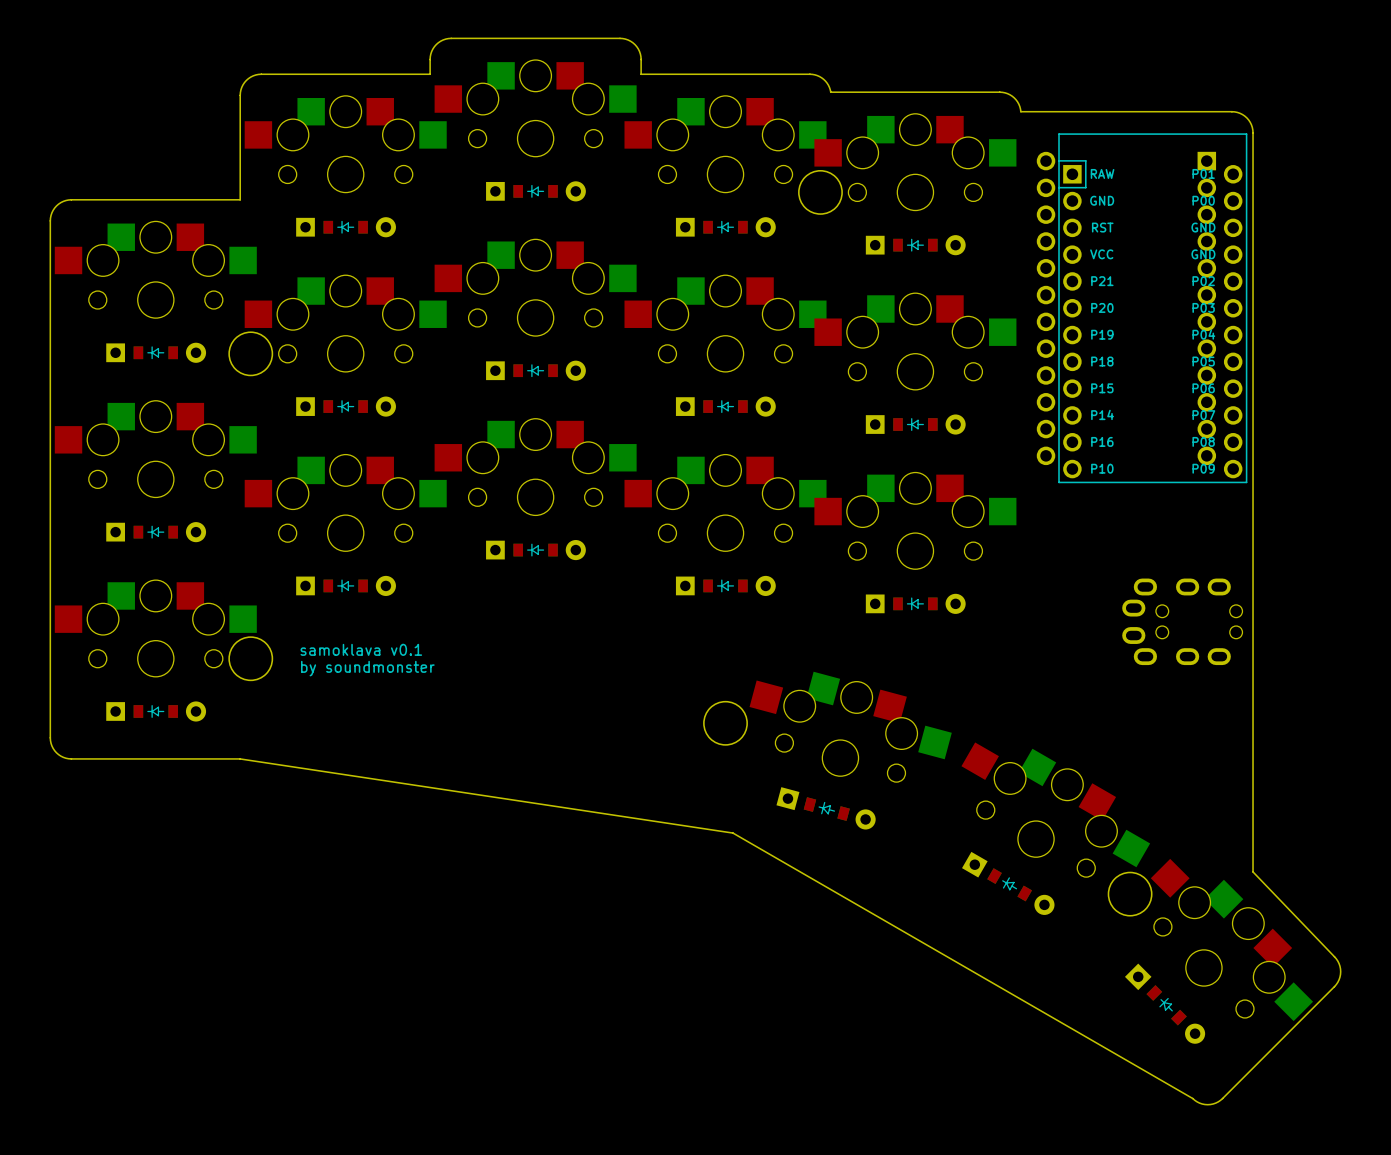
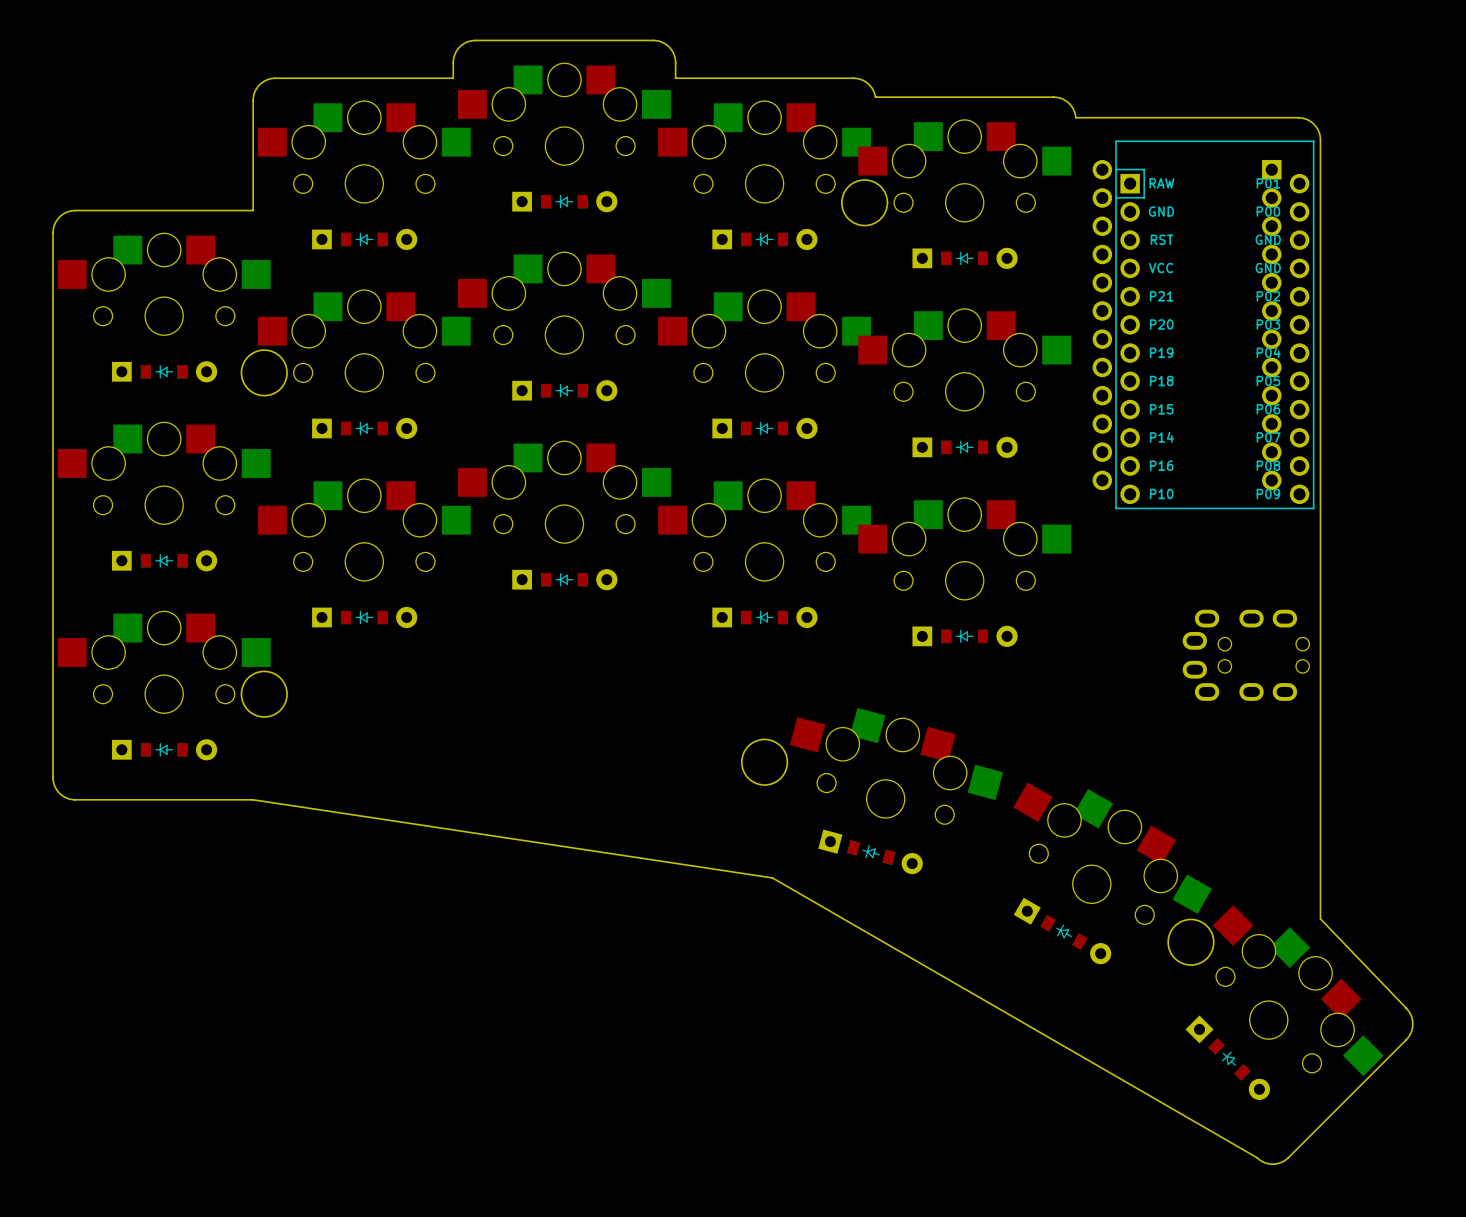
text: samoklava v0.1 (361, 649) -> none
text: by soundmonster (367, 668) -> none

